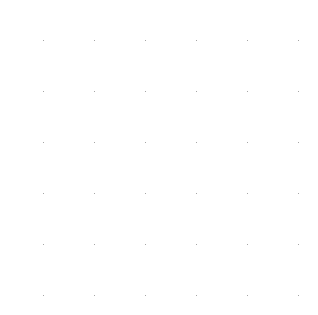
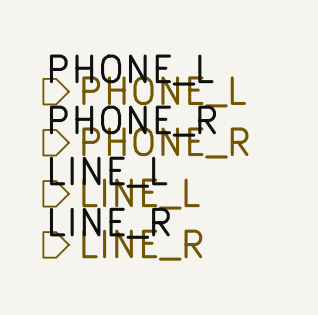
label: none -> PHONE_L (131, 70)
hierarchical label: none -> PHONE_L (164, 91)
label: none -> PHONE_R (132, 121)
hierarchical label: none -> PHONE_R (165, 142)
label: none -> LINE_L (108, 172)
hierarchical label: none -> LINE_L (141, 194)
label: none -> LINE_R (109, 223)
hierarchical label: none -> LINE_R (142, 245)

